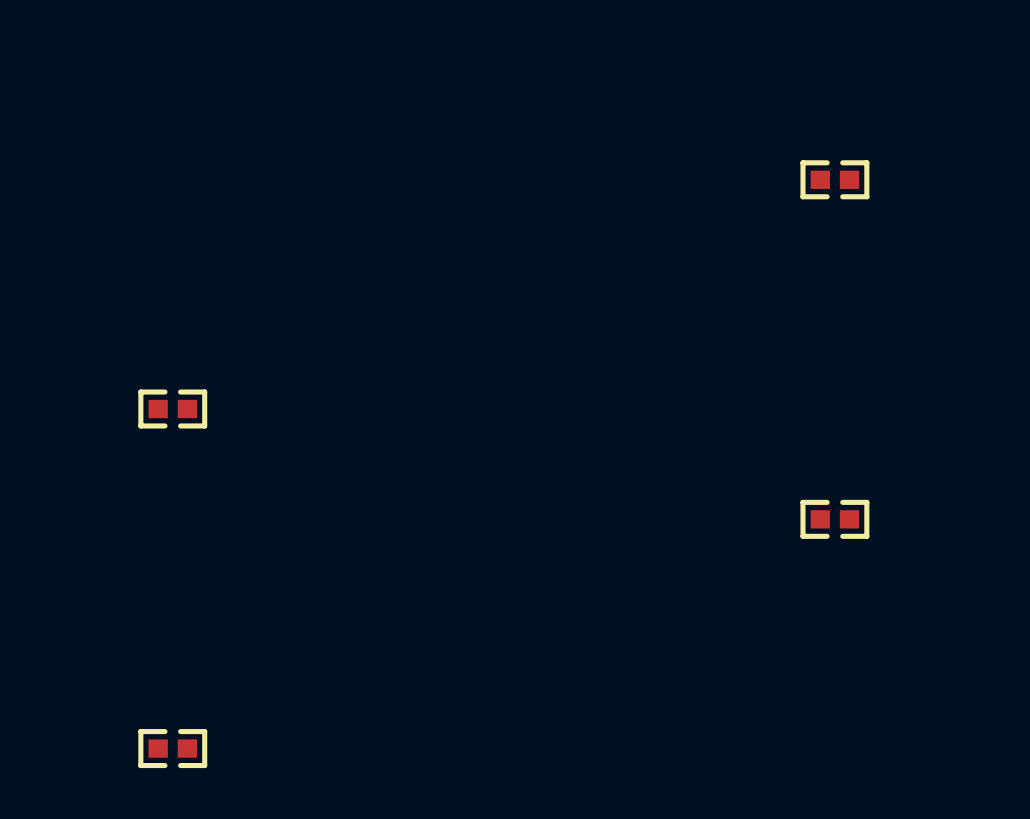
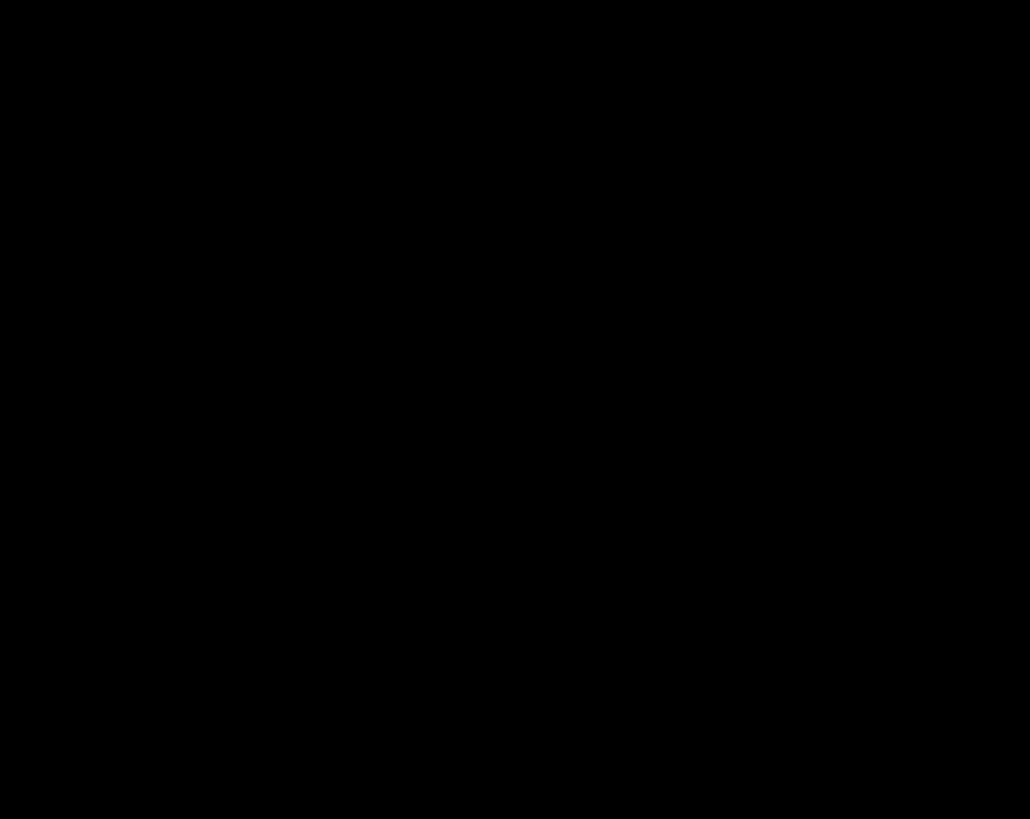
part: (834, 179) -> none
part: (172, 408) -> none
part: (834, 519) -> none
part: (172, 748) -> none

